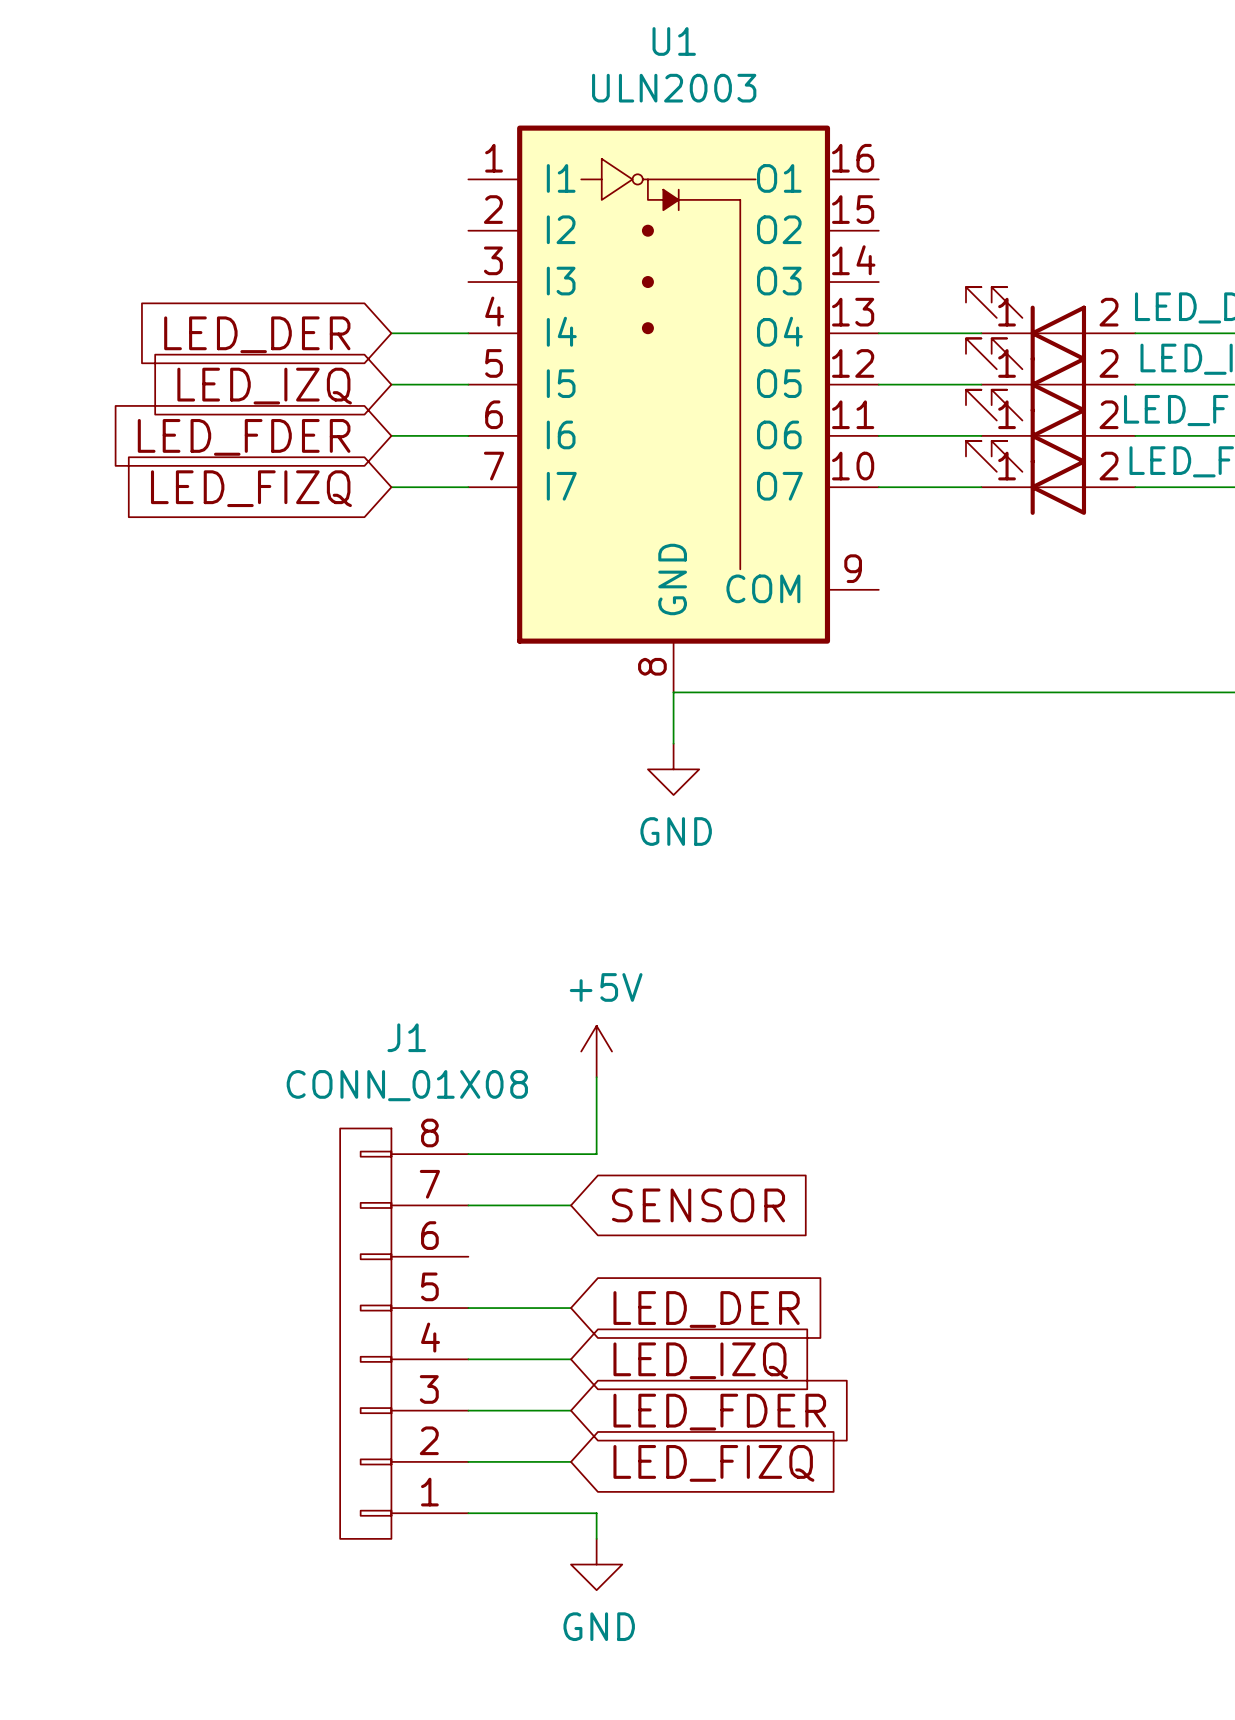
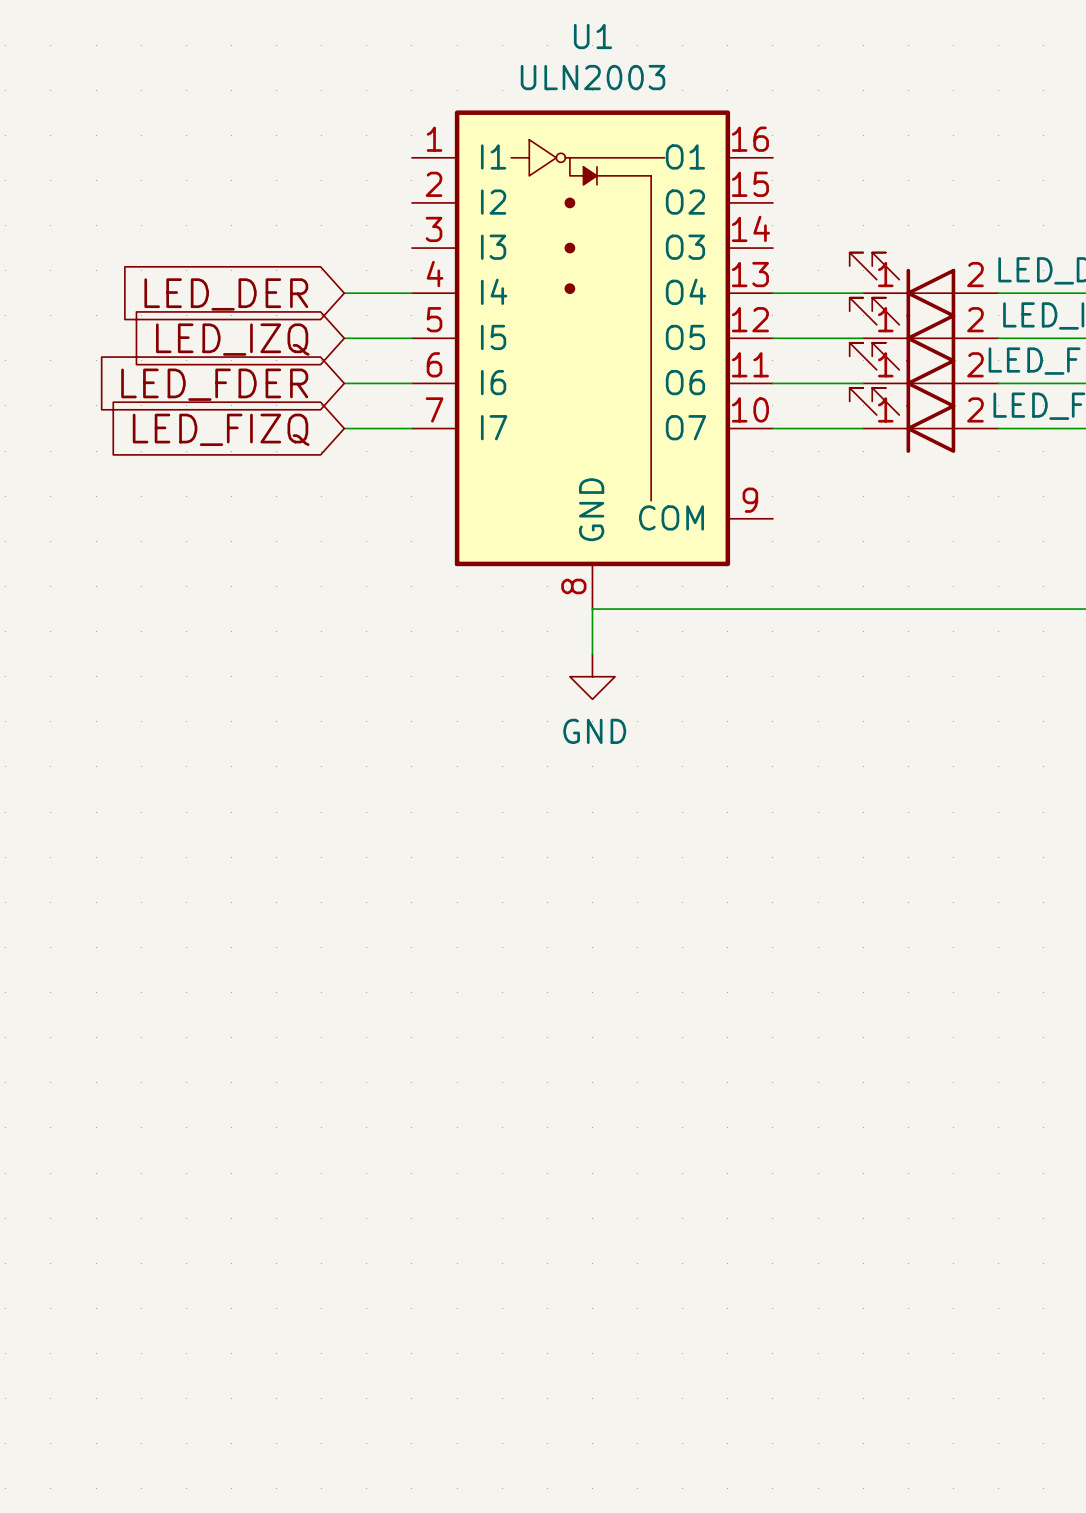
power symbol: +5V (596, 1051) -> none
wire: (596, 1077) (596, 1154) (468, 1154) -> none
wire: (468, 1205) (570, 1205) -> none
global label: SENSOR (698, 1205) -> none
wire: (468, 1308) (570, 1308) -> none
global label: LED_DER (706, 1309) -> none
J1: CONN_01X08 (404, 1333) -> none
wire: (468, 1359) (570, 1359) -> none
global label: LED_IZQ (700, 1360) -> none
wire: (468, 1410) (570, 1410) -> none
global label: LED_FDER (719, 1412) -> none
wire: (468, 1461) (570, 1461) -> none
global label: LED_FIZQ (713, 1463) -> none
wire: (468, 1513) (596, 1513) (596, 1538) -> none
power symbol: GND (596, 1564) -> none

